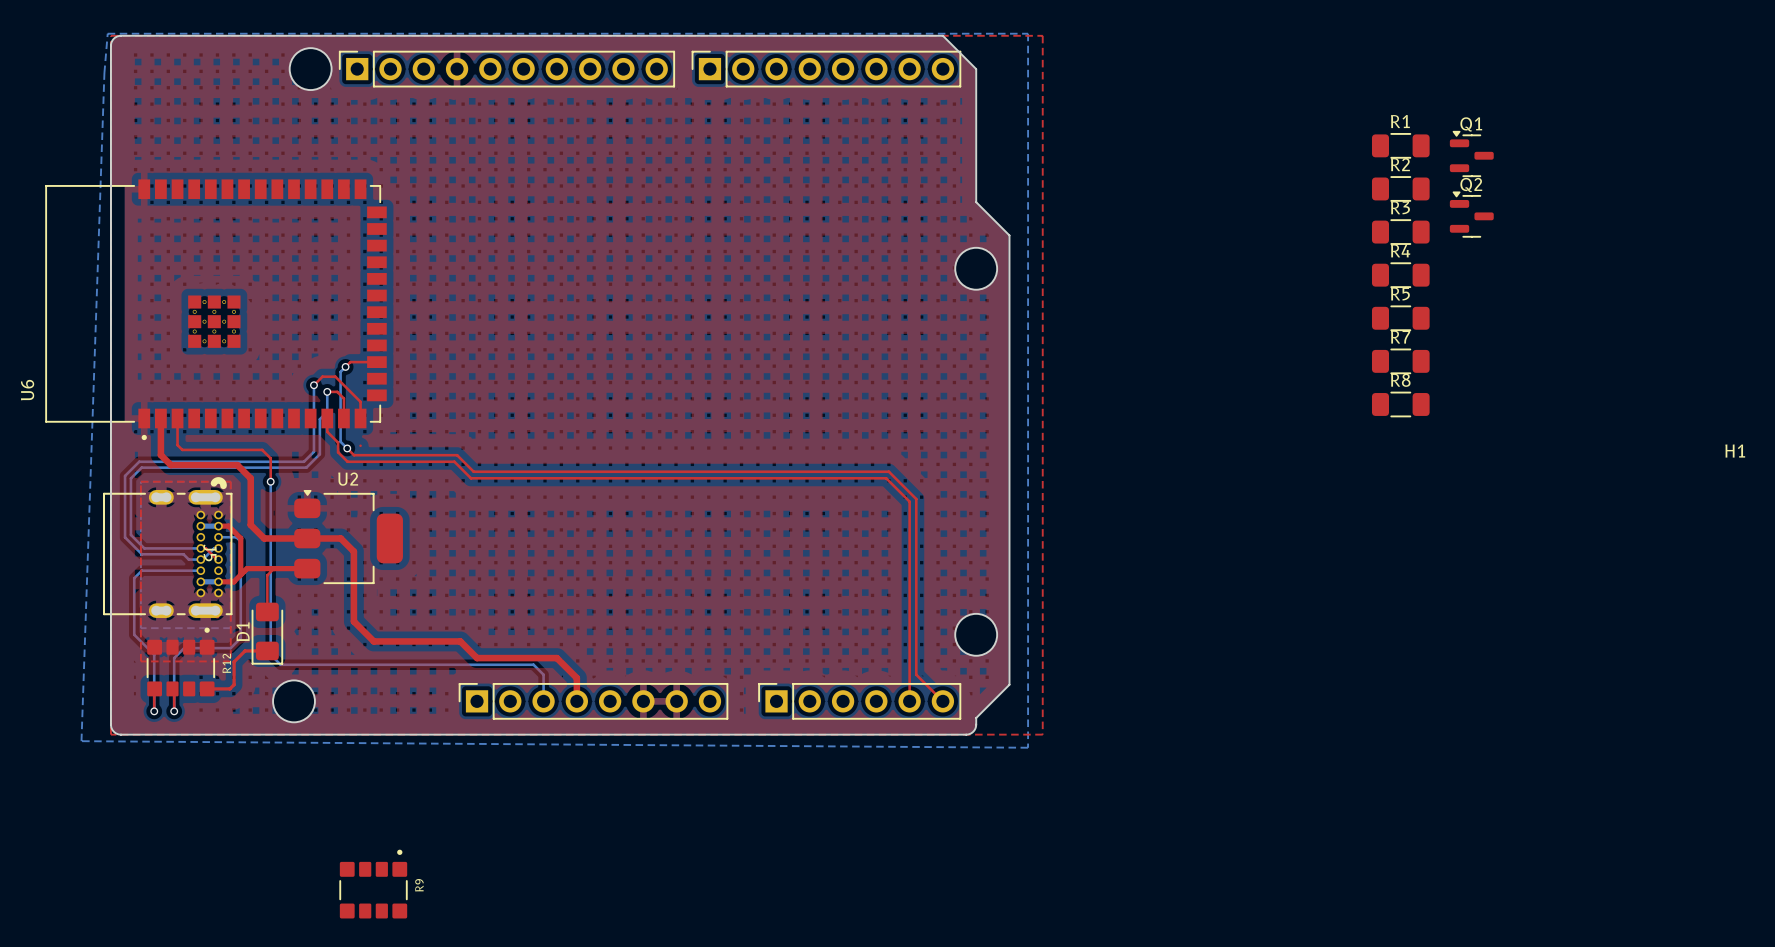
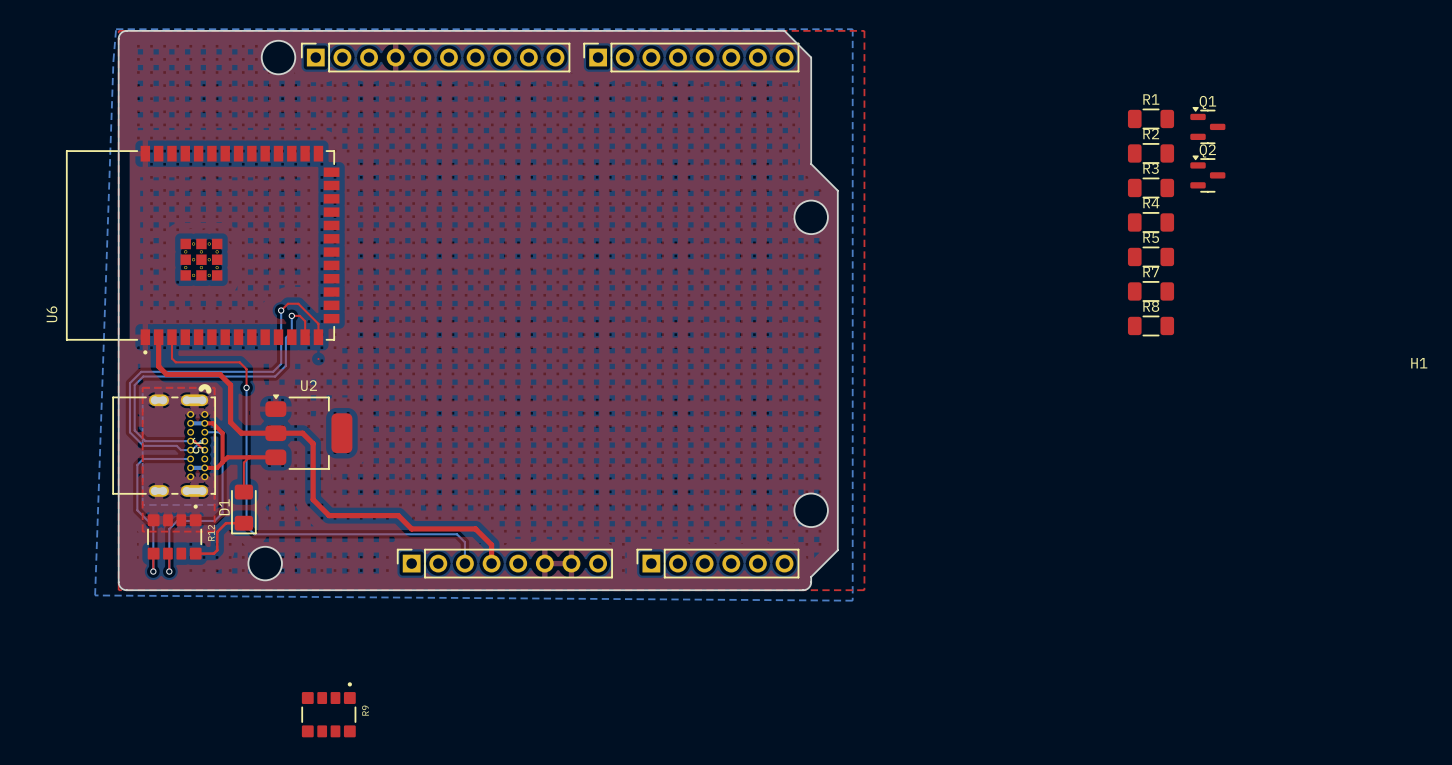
top track: (376, 362) (350, 362) (345, 366) -> none
bottom track: (345, 366) (340, 371) (340, 441) (347, 448) -> none
via: (345, 366) -> none
top track: (327, 418) (327, 431) (338, 442) (338, 452) (347, 461) (454, 461) (470, 478) (886, 478) (909, 501) (909, 701) -> none
top track: (347, 448) (354, 455) (457, 455) (473, 471) (888, 471) (916, 499) (916, 674) (942, 701) -> none
via: (347, 448) -> none

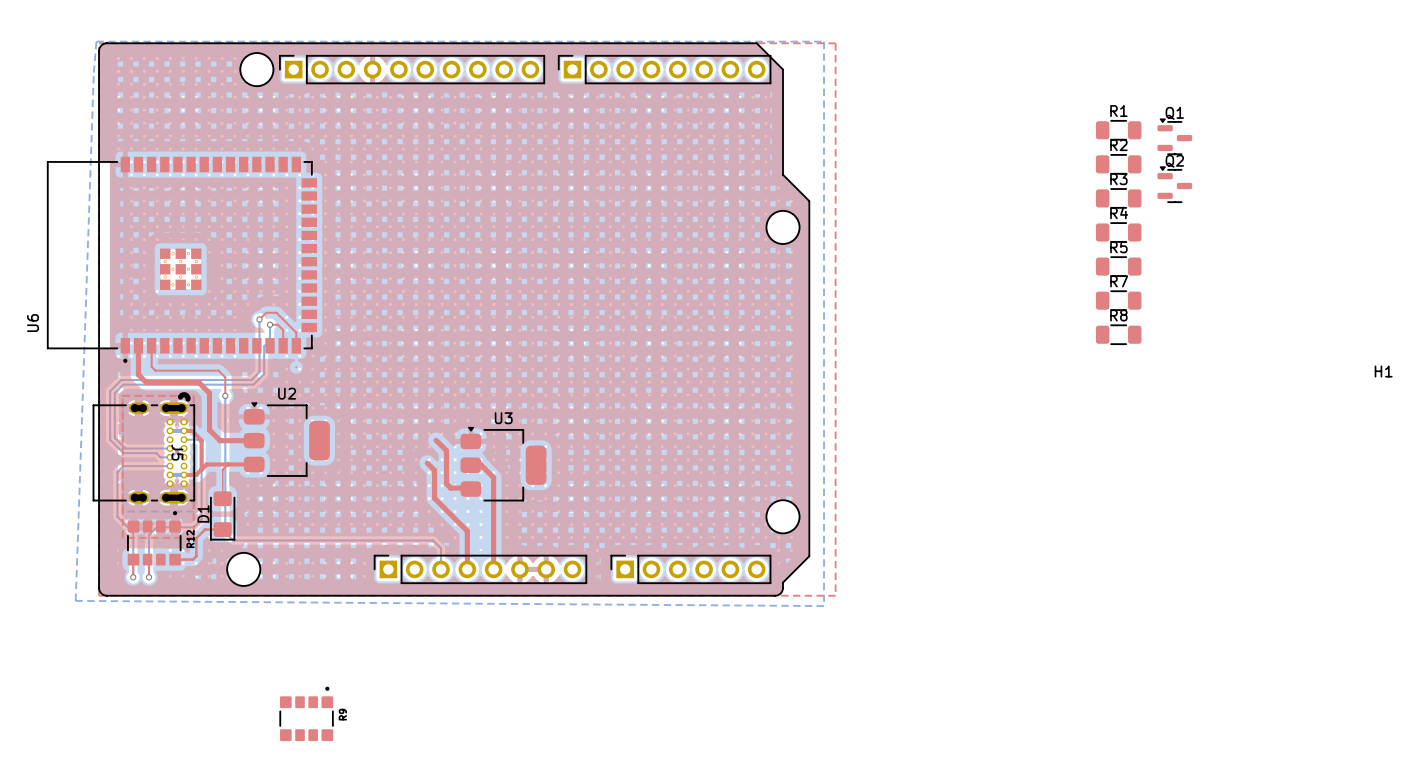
top track: none -> (436, 440) (446, 450) (446, 483) (450, 488) (471, 488)
top track: (275, 433) (302, 433) (313, 443) (313, 499) (329, 515) (398, 515) (411, 528) (475, 528) (491, 544) -> (427, 463) (434, 470) (434, 498) (467, 531) (467, 551)
U3: none -> (503, 464)
top track: none -> (470, 465) (481, 465) (493, 477) (493, 569)

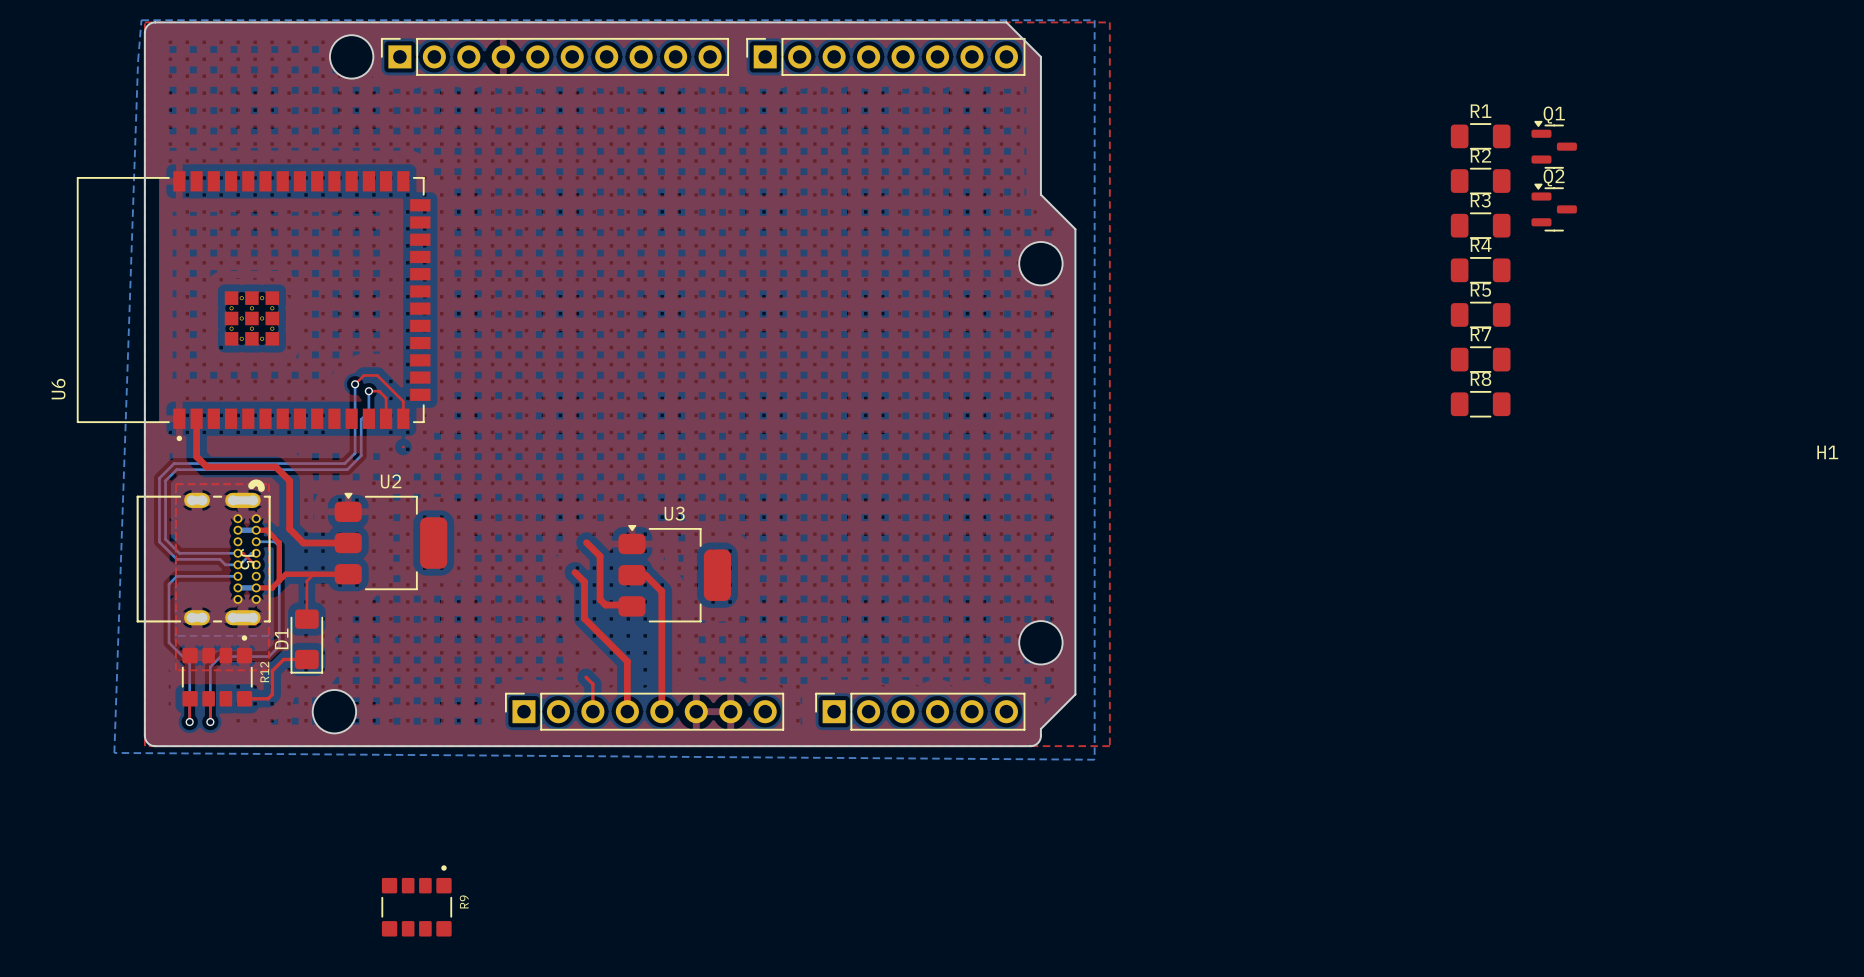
top track: (151, 345) (151, 366) (155, 370) (218, 370) (225, 377) (225, 395) -> none
bottom track: (225, 395) (225, 532) (233, 540) (433, 540) (441, 548) (441, 569) -> none
via: (225, 395) -> none
top track: none -> (586, 677) (592, 684) (592, 711)

